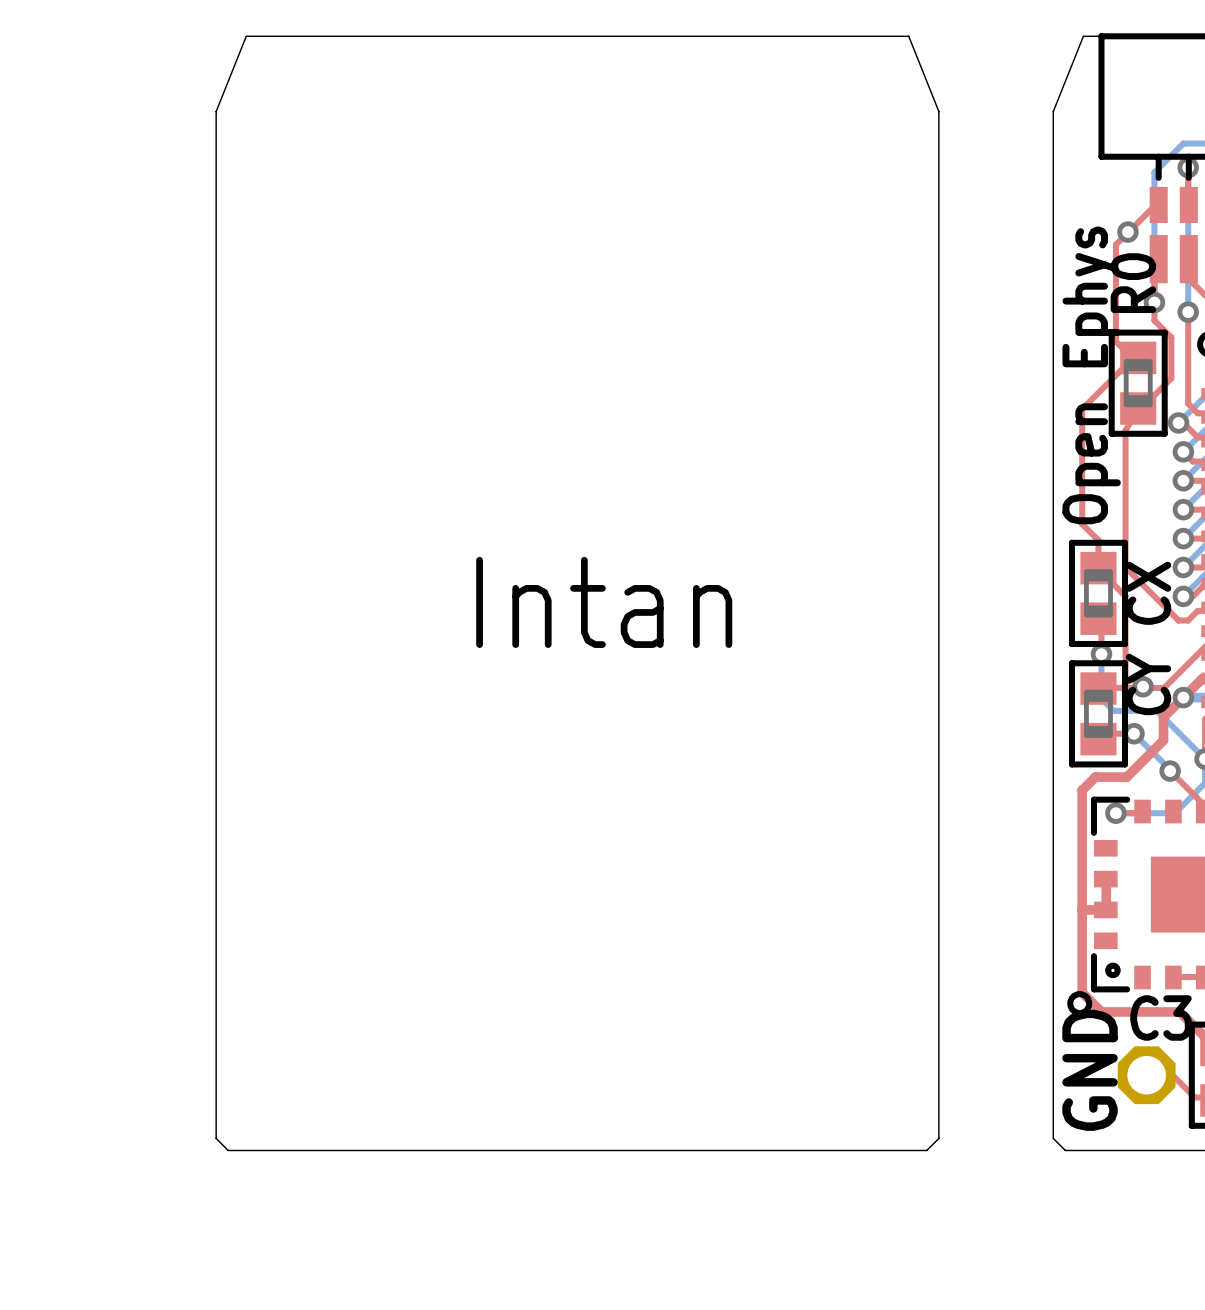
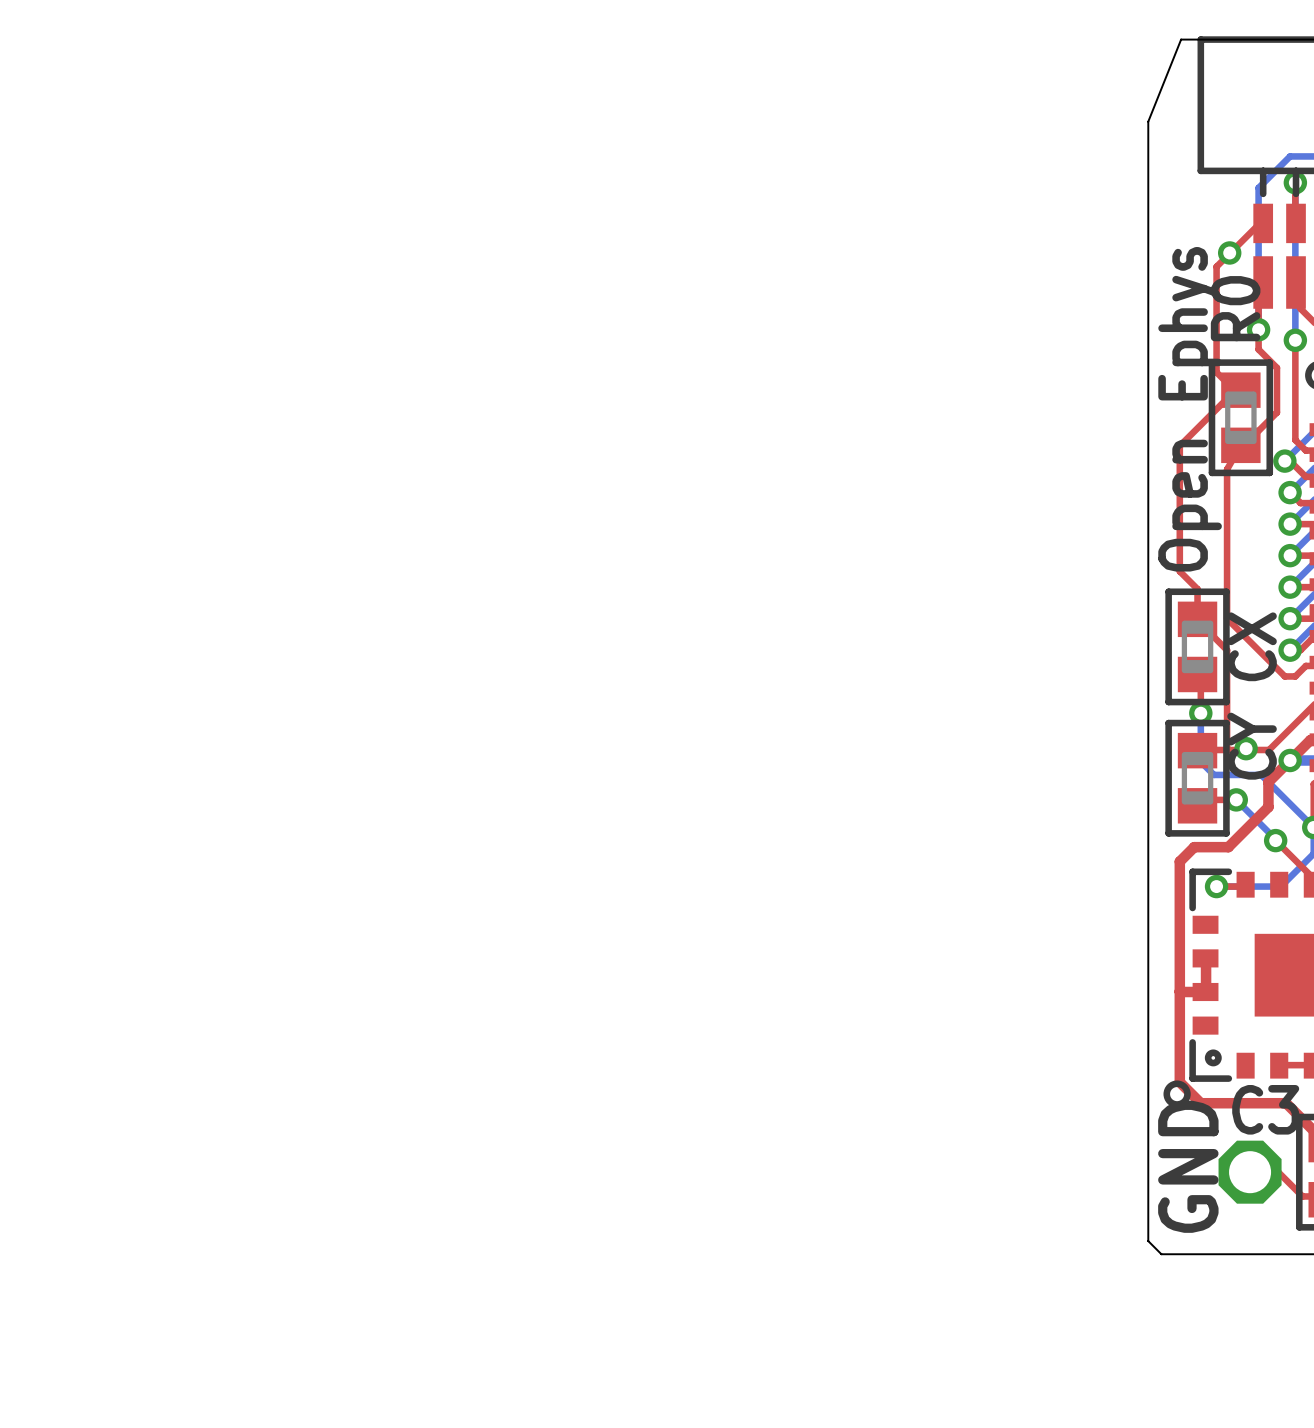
board edge: (246, 36) (908, 36) (938, 111) (938, 1138) (926, 1150) (228, 1150) (216, 1138) (216, 111) (246, 36) -> none
text: Intan (604, 602) -> none

